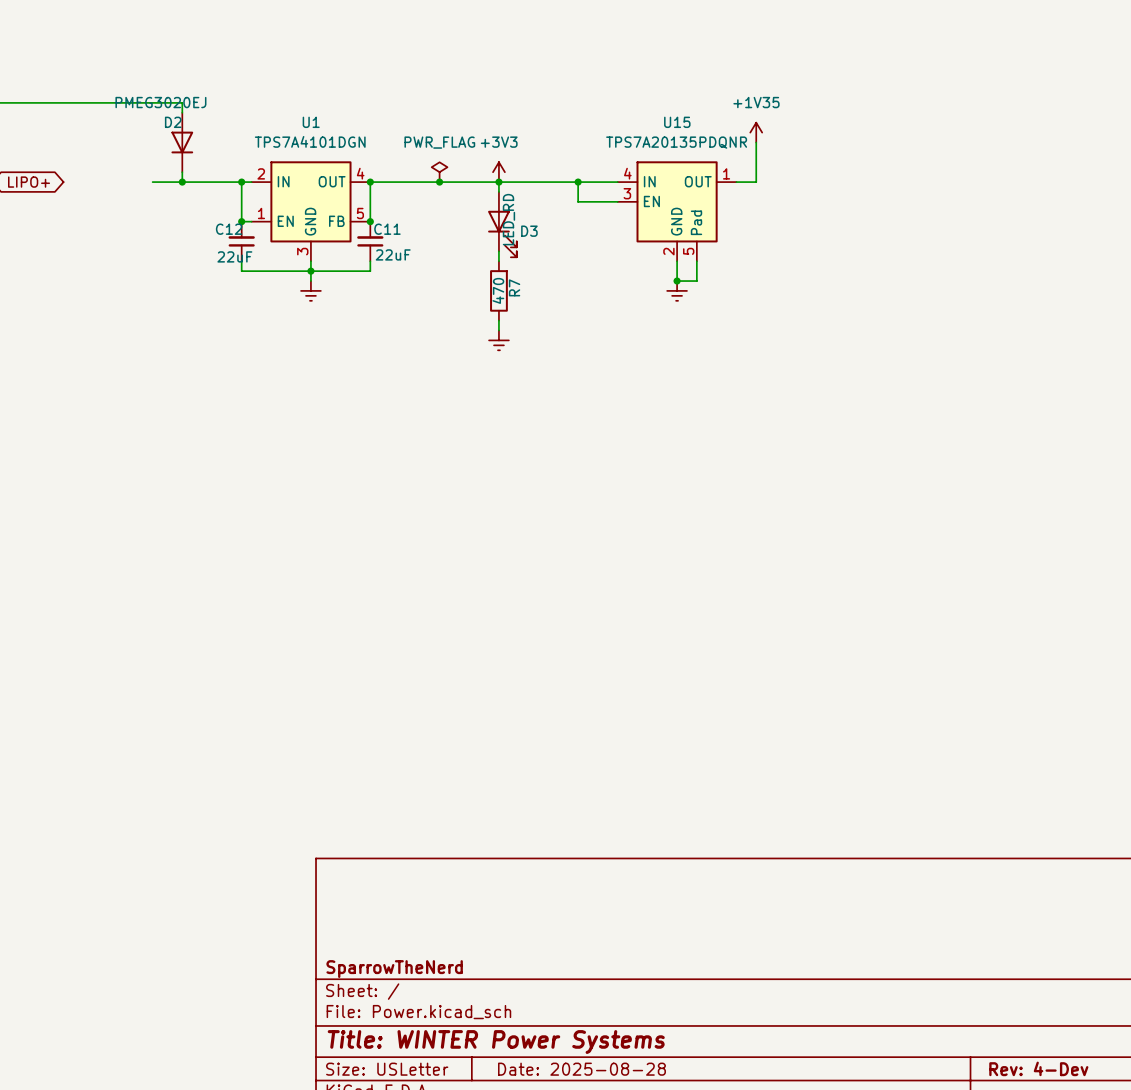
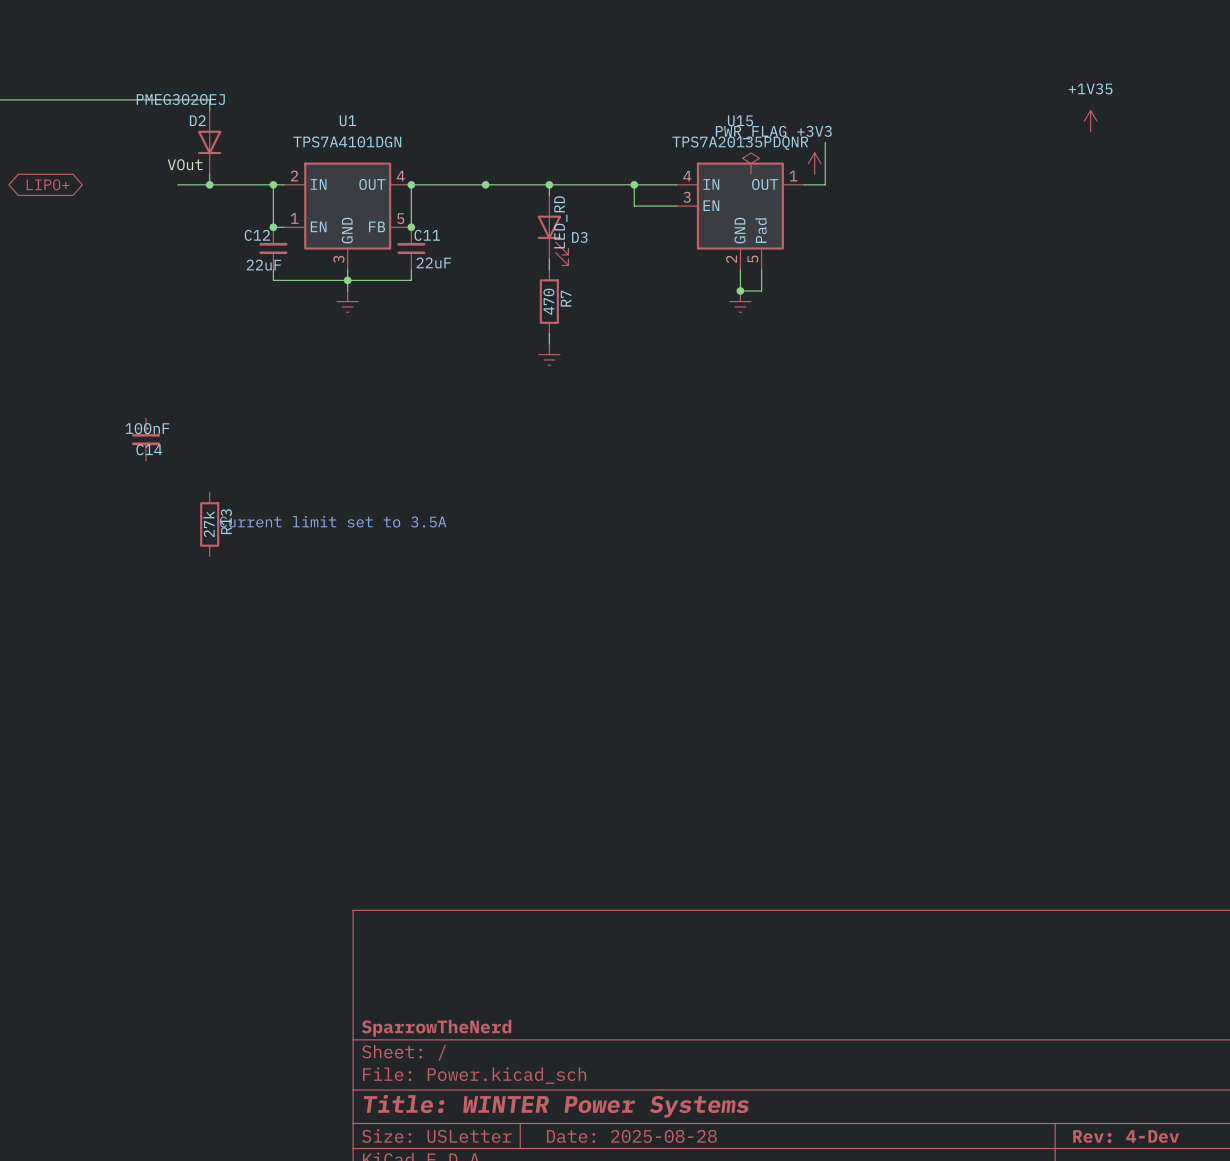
power symbol: none -> +1V35 (1090, 121)
power symbol: +1V35 (756, 132) -> none
power symbol: none -> PWR_FLAG (751, 163)
power symbol: none -> +3V3 (814, 163)
label: none -> VOut (185, 164)
power symbol: PWR_FLAG (439, 172) -> none
power symbol: +3V3 (498, 172) -> none
C14: none -> 100nF (146, 439)
text: none -> Current limit set to 3.5A (333, 521)
R13: none -> 27k (209, 524)

